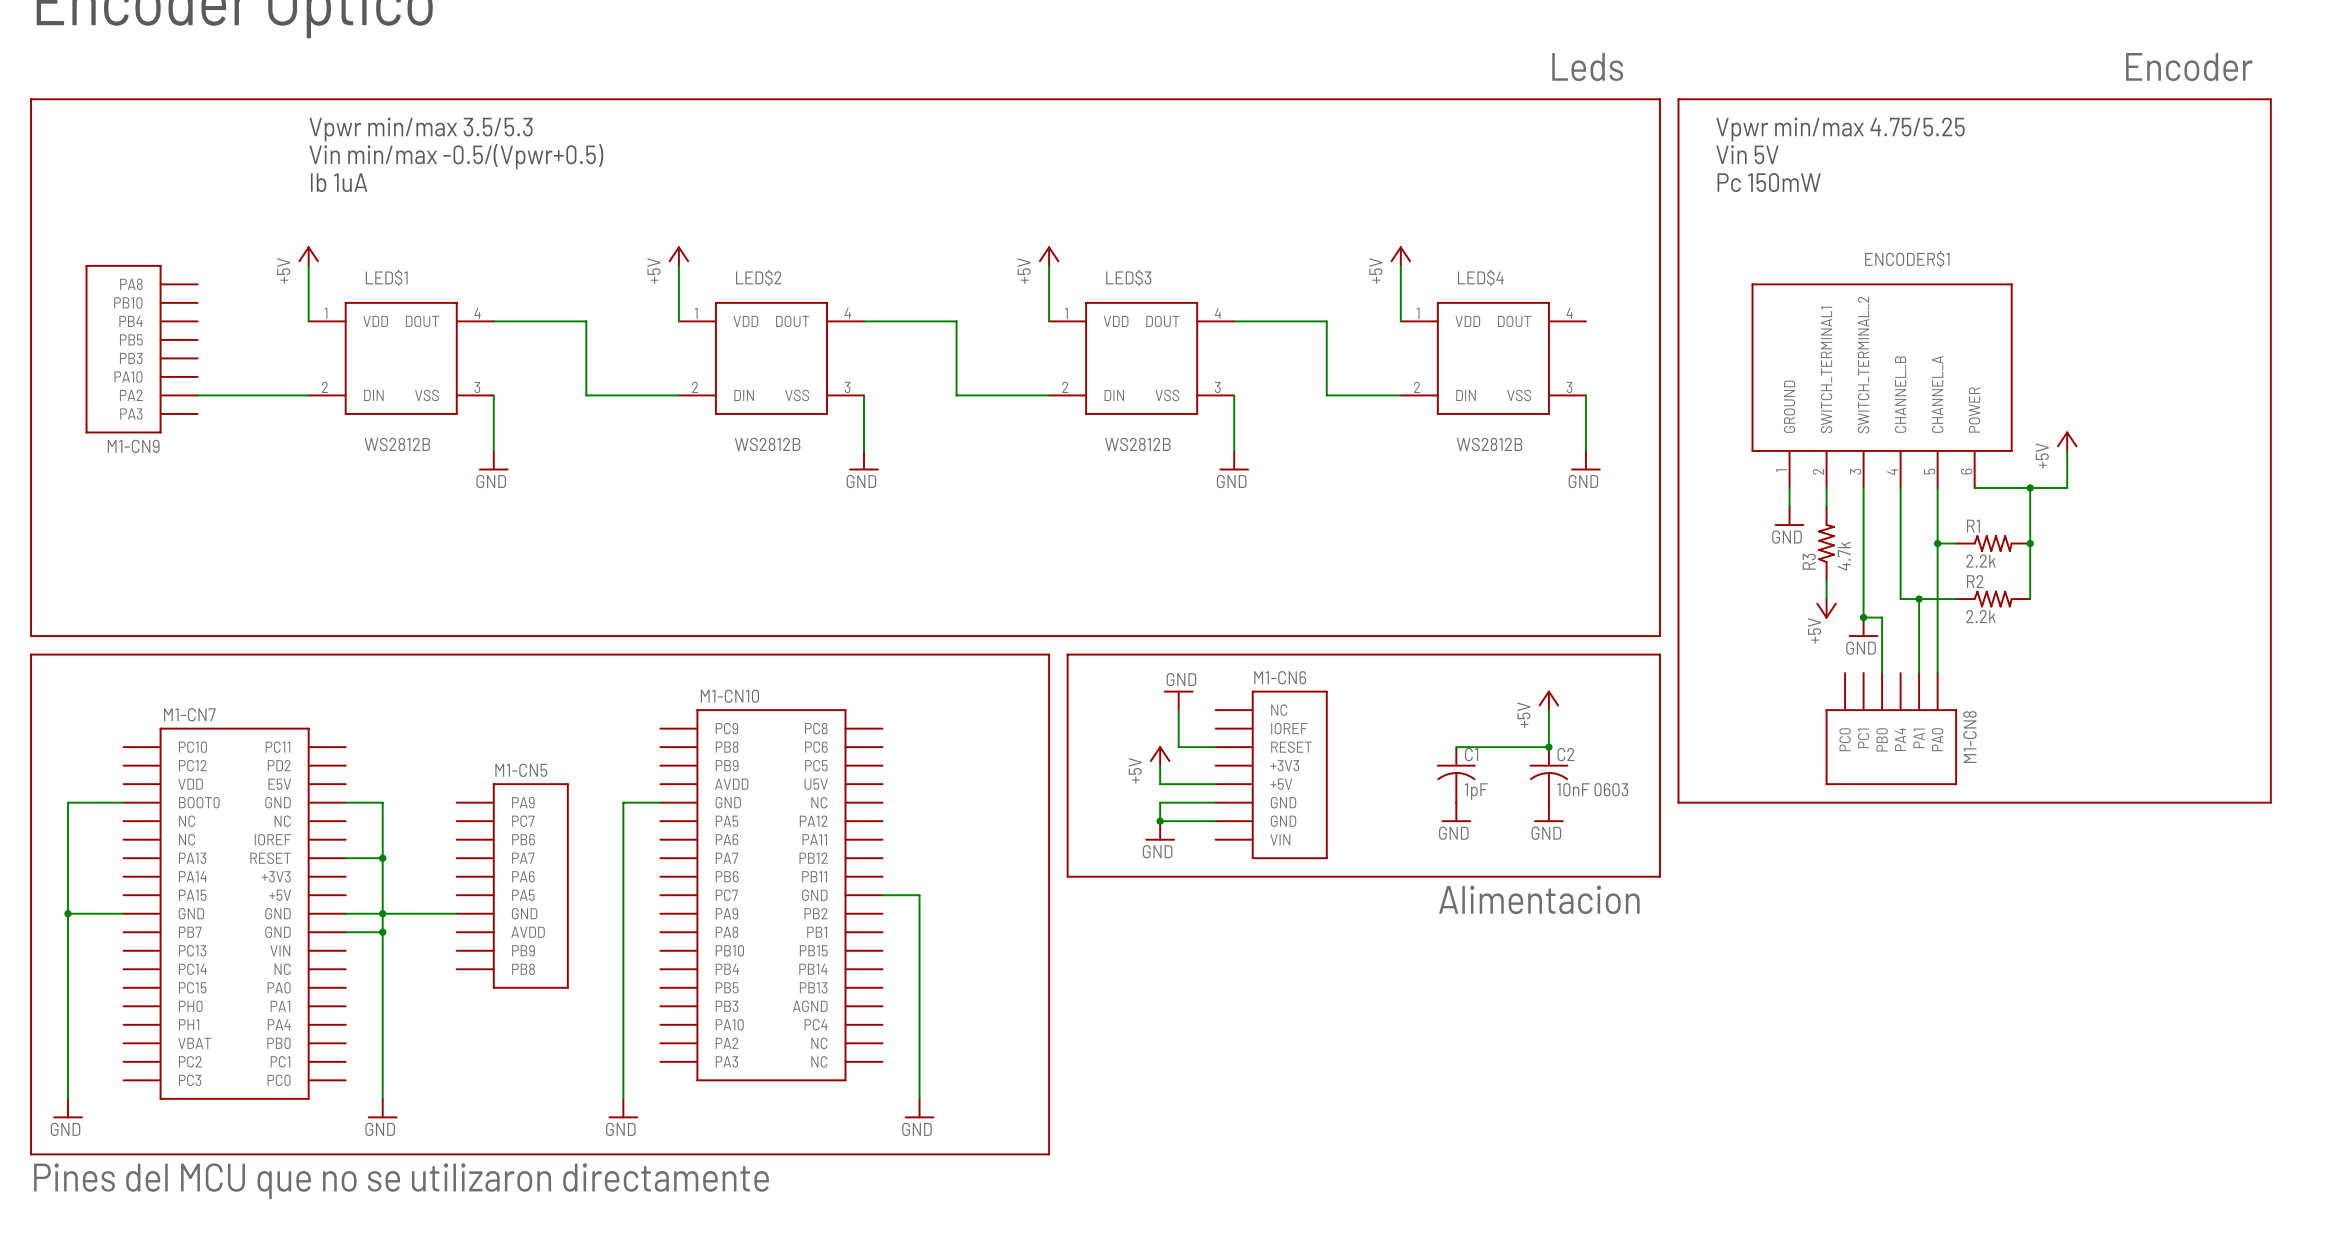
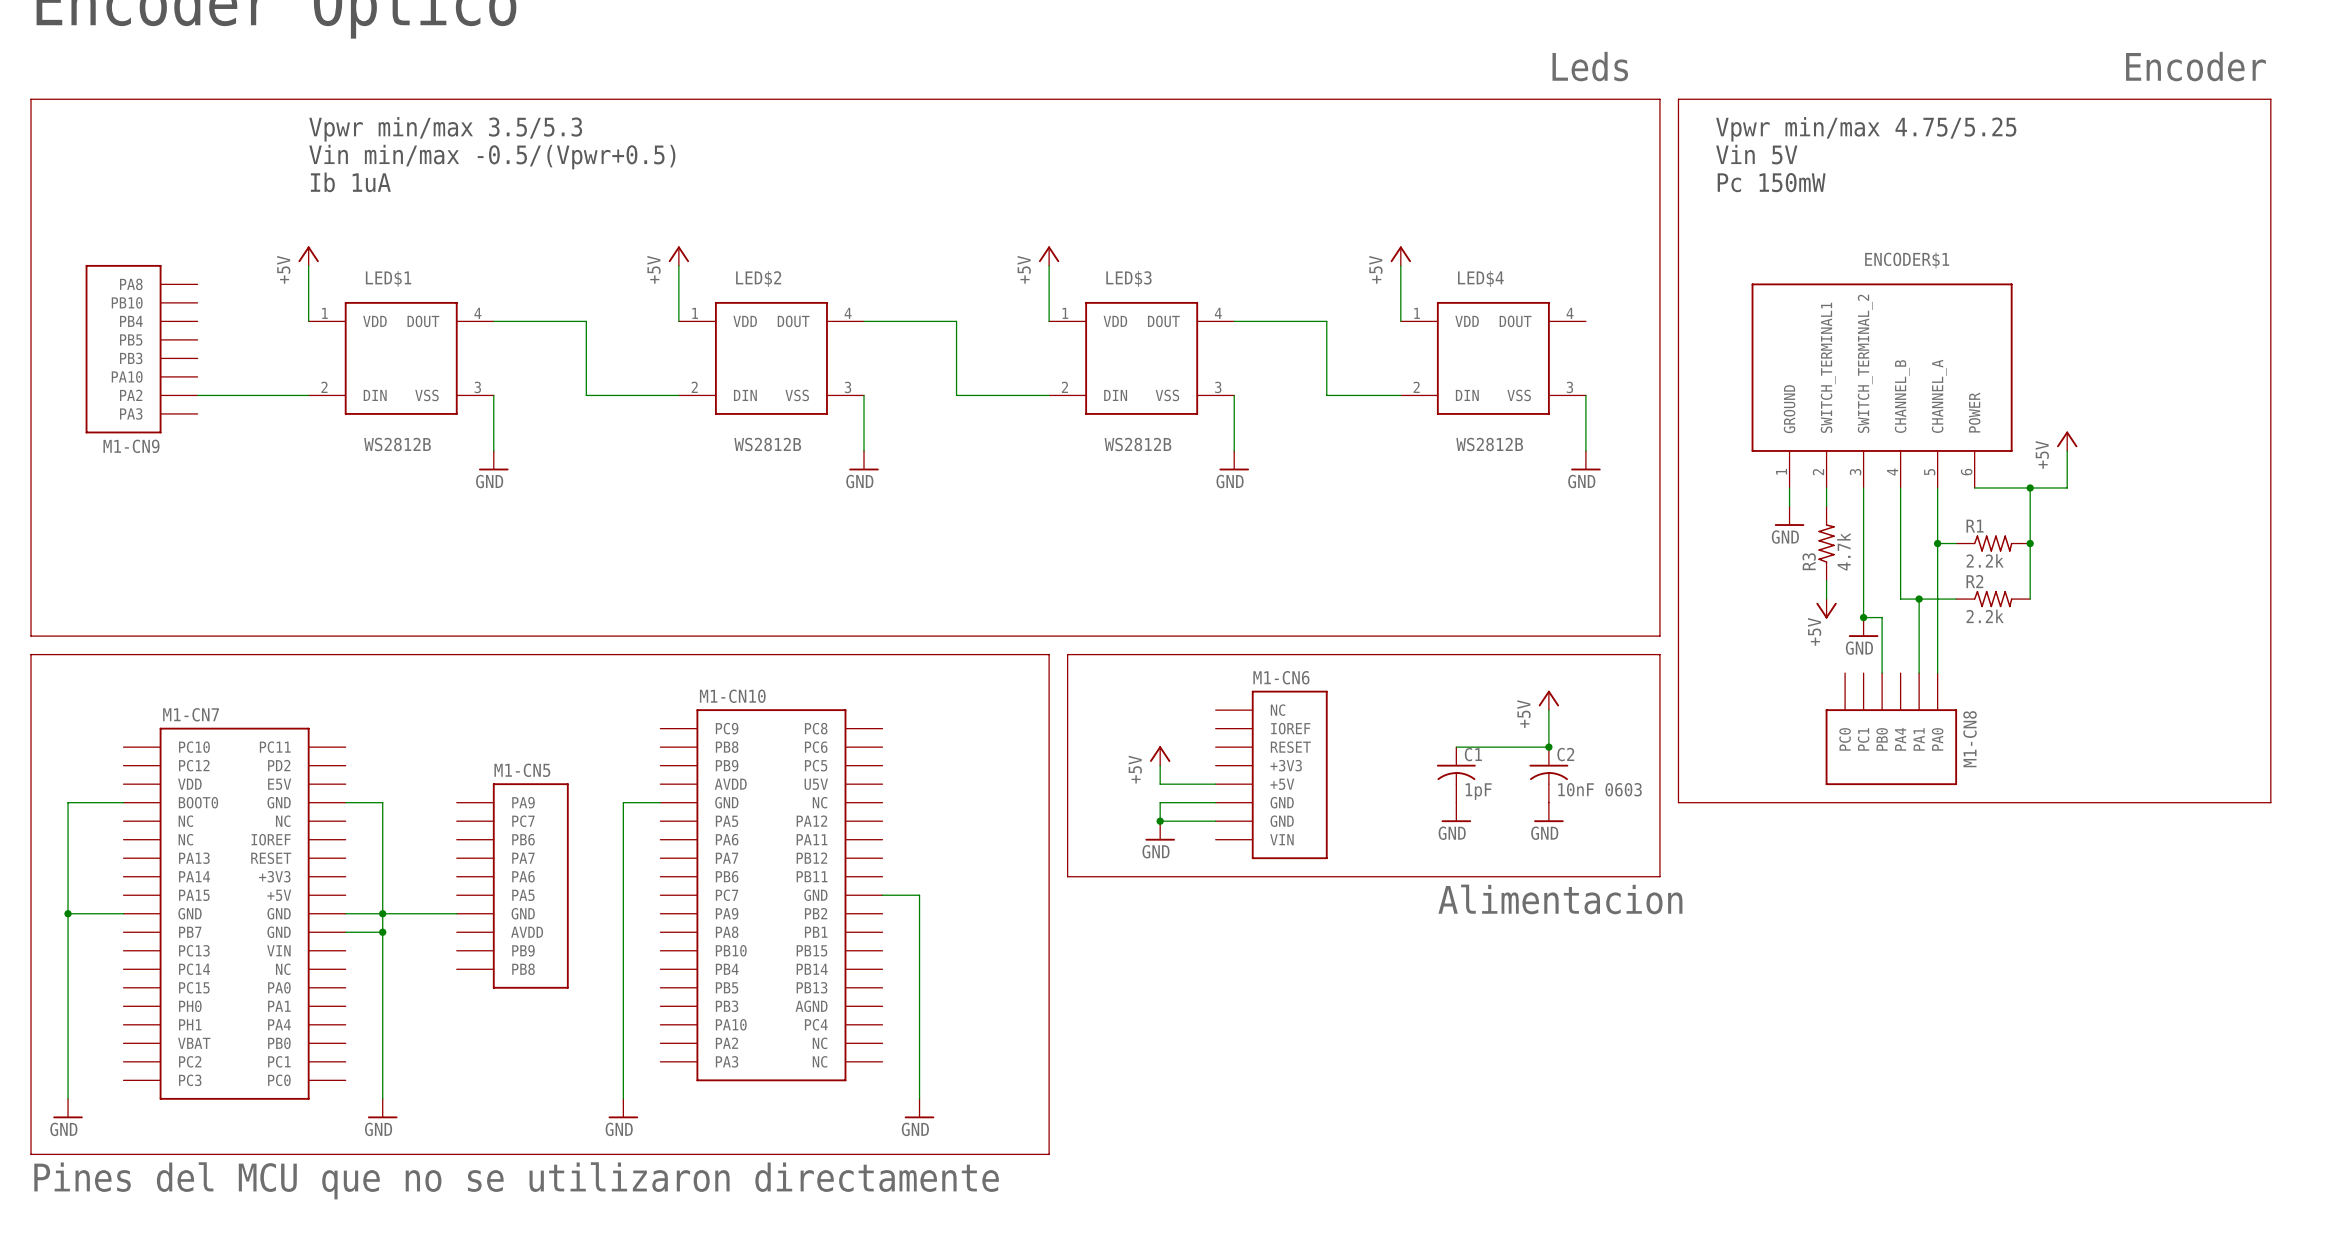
power symbol: GND (1178, 700) -> none
wire: (1178, 710) (1178, 747) (1215, 747) -> none
wire: (345, 858) (382, 858) -> none
junction: (382, 858) -> none

